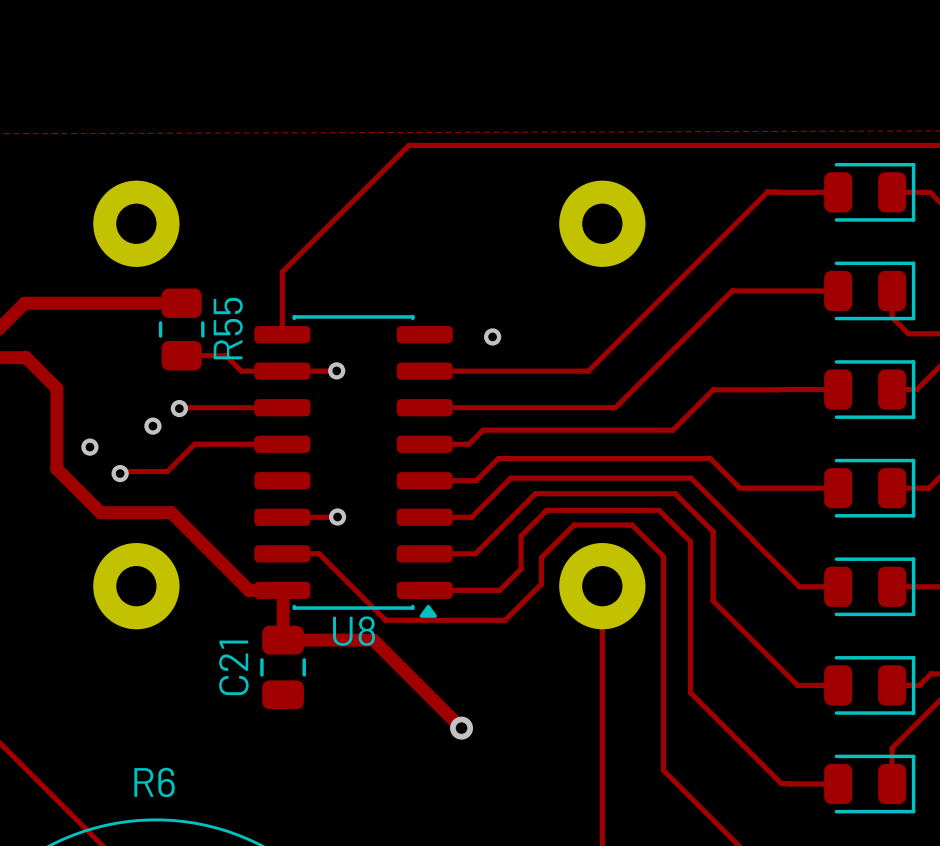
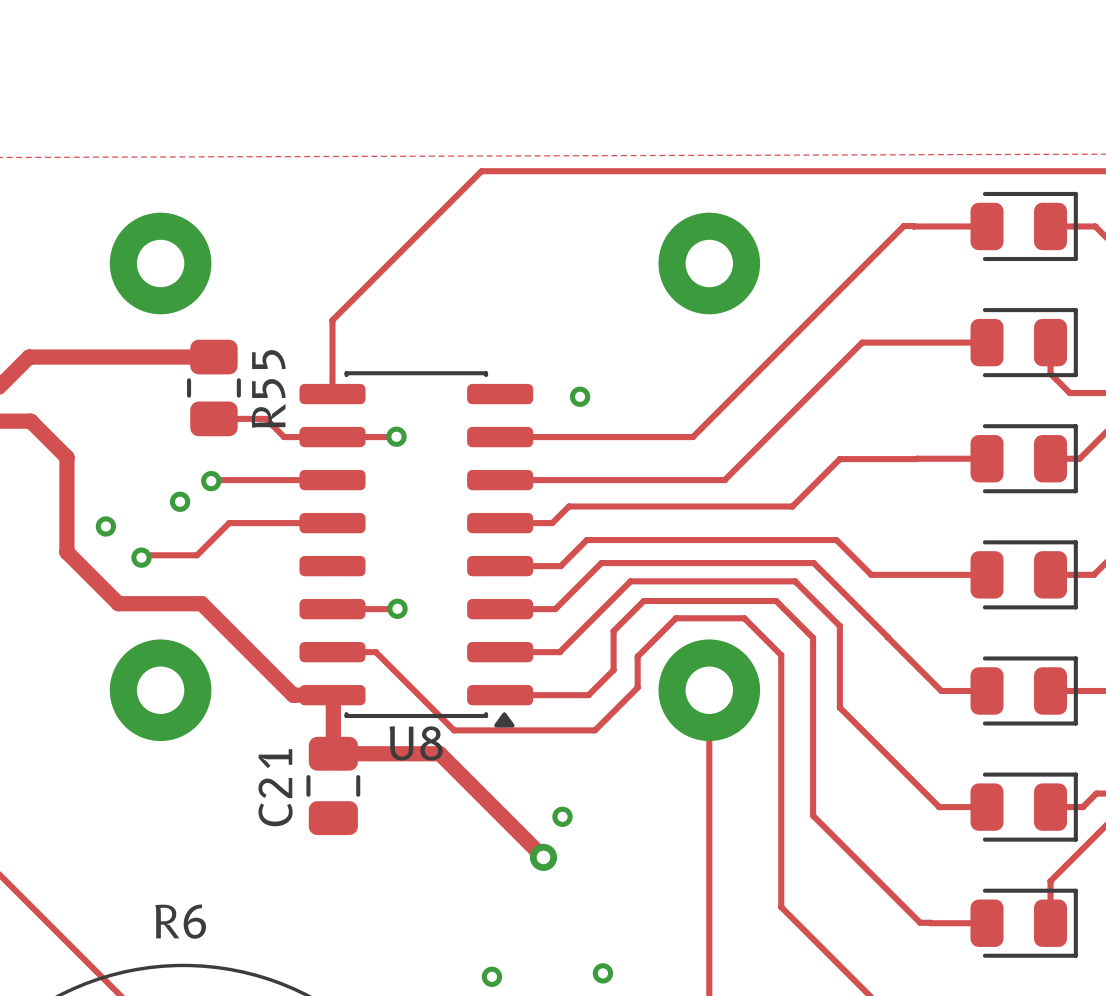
via: none -> (562, 816)
via: none -> (602, 973)
via: none -> (491, 976)

